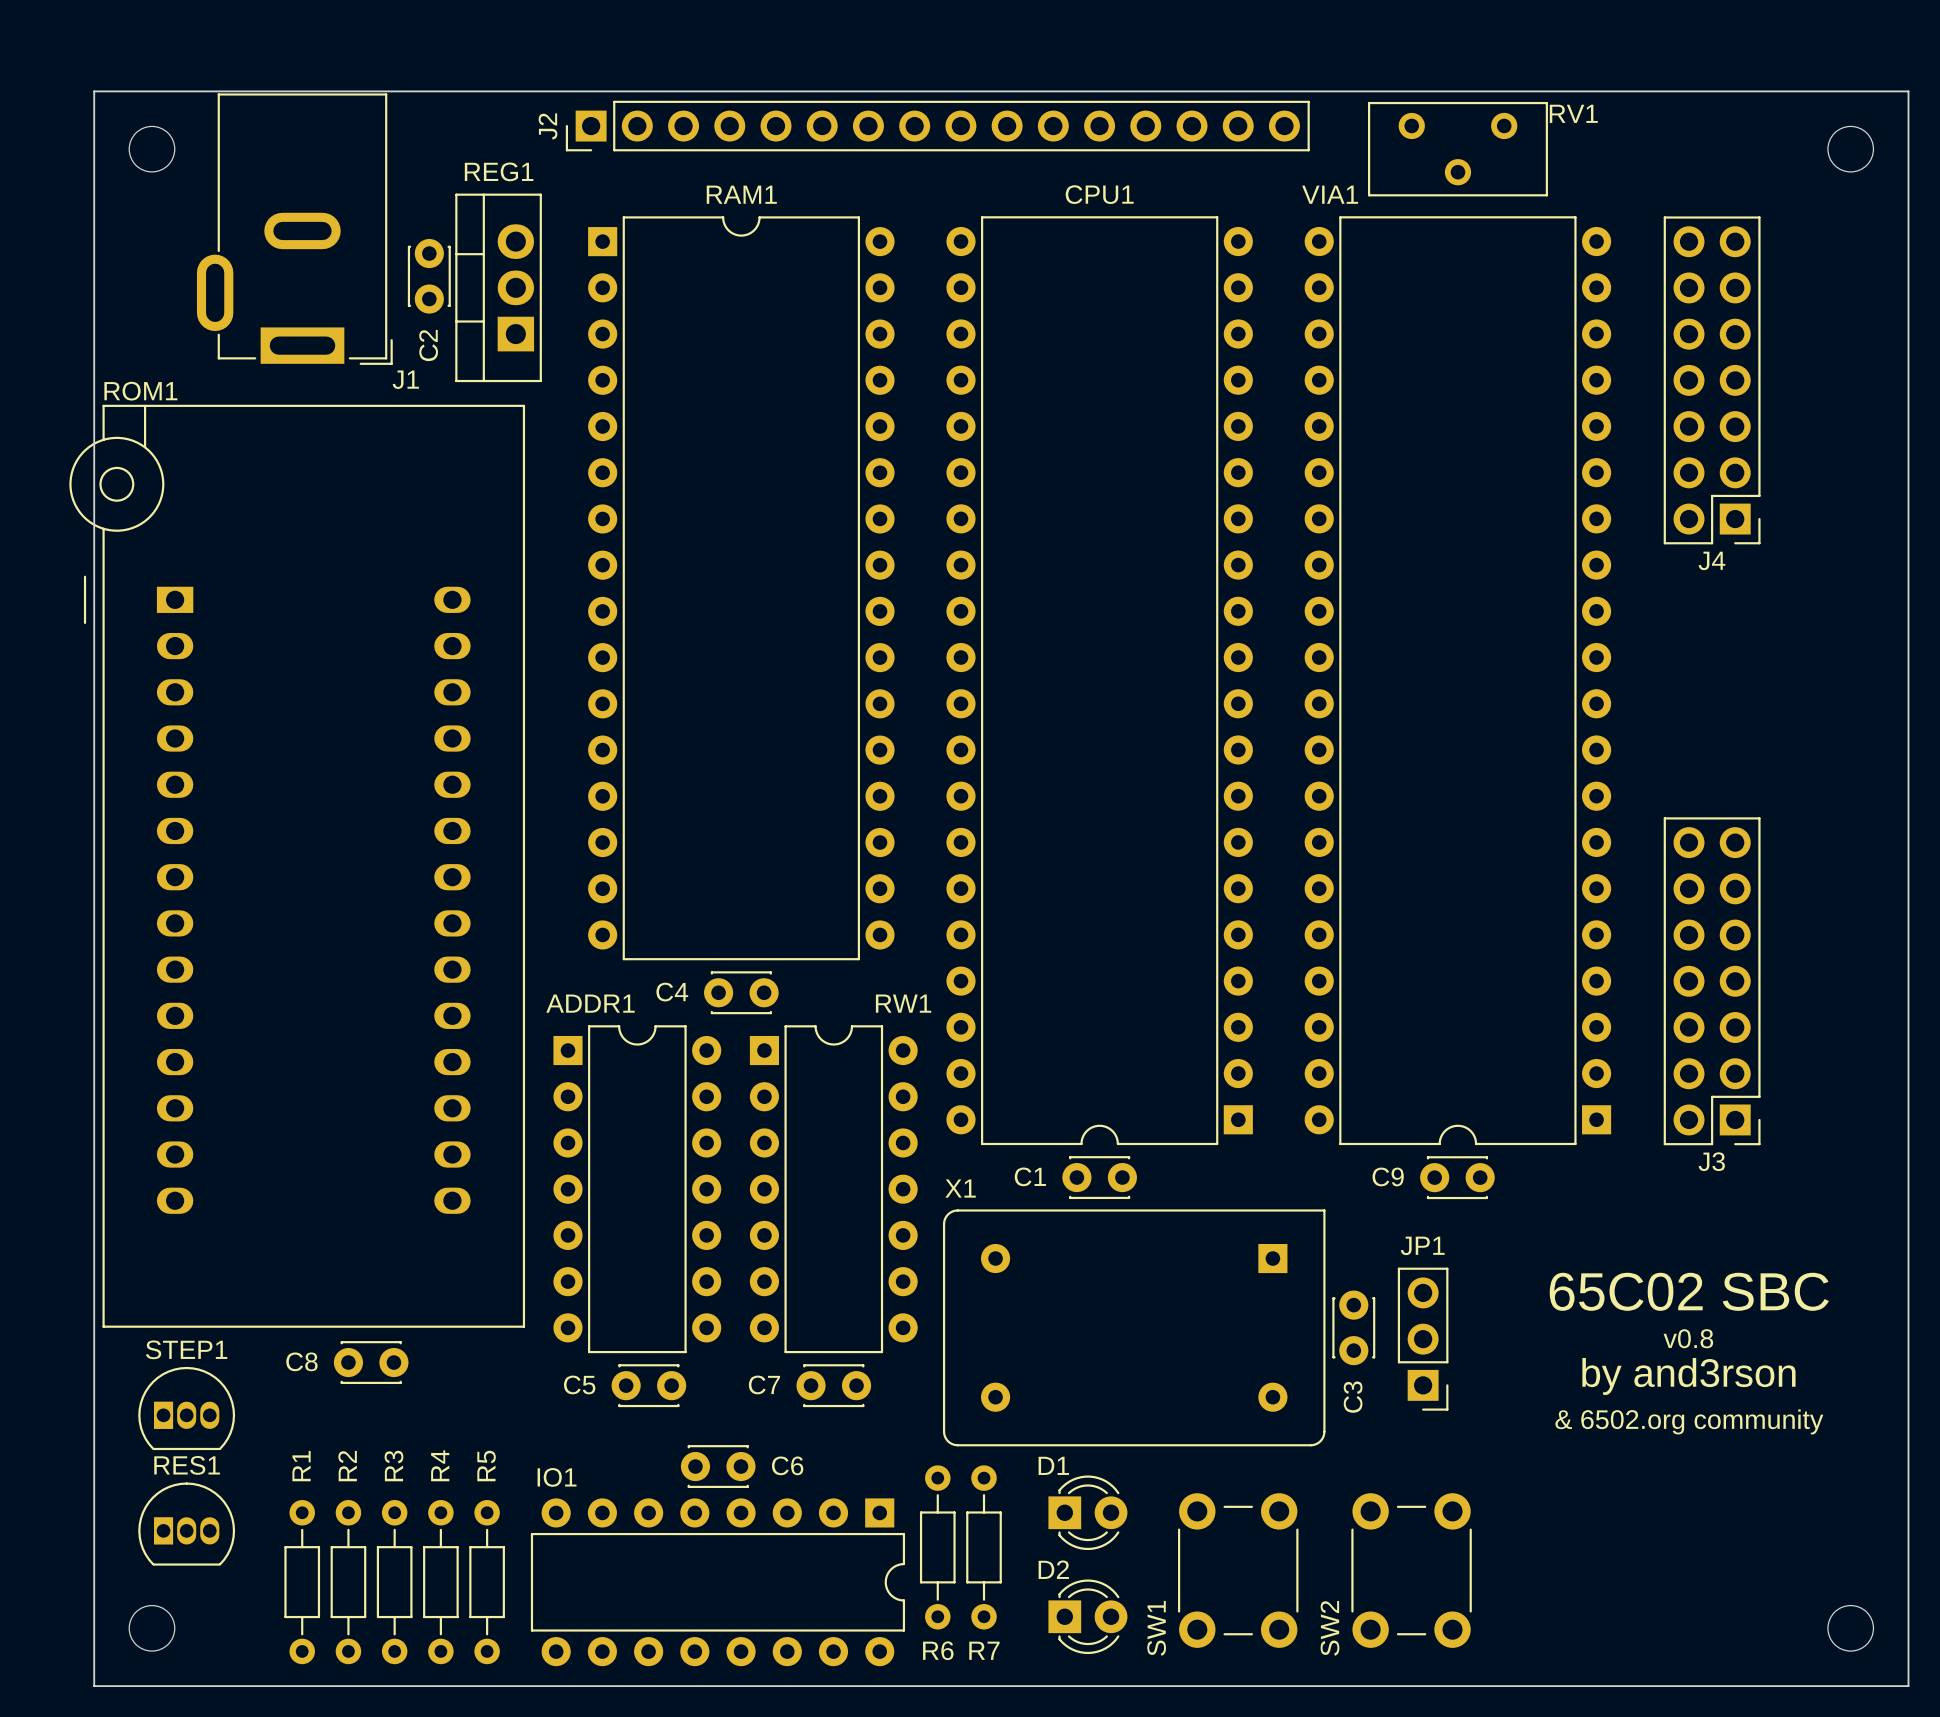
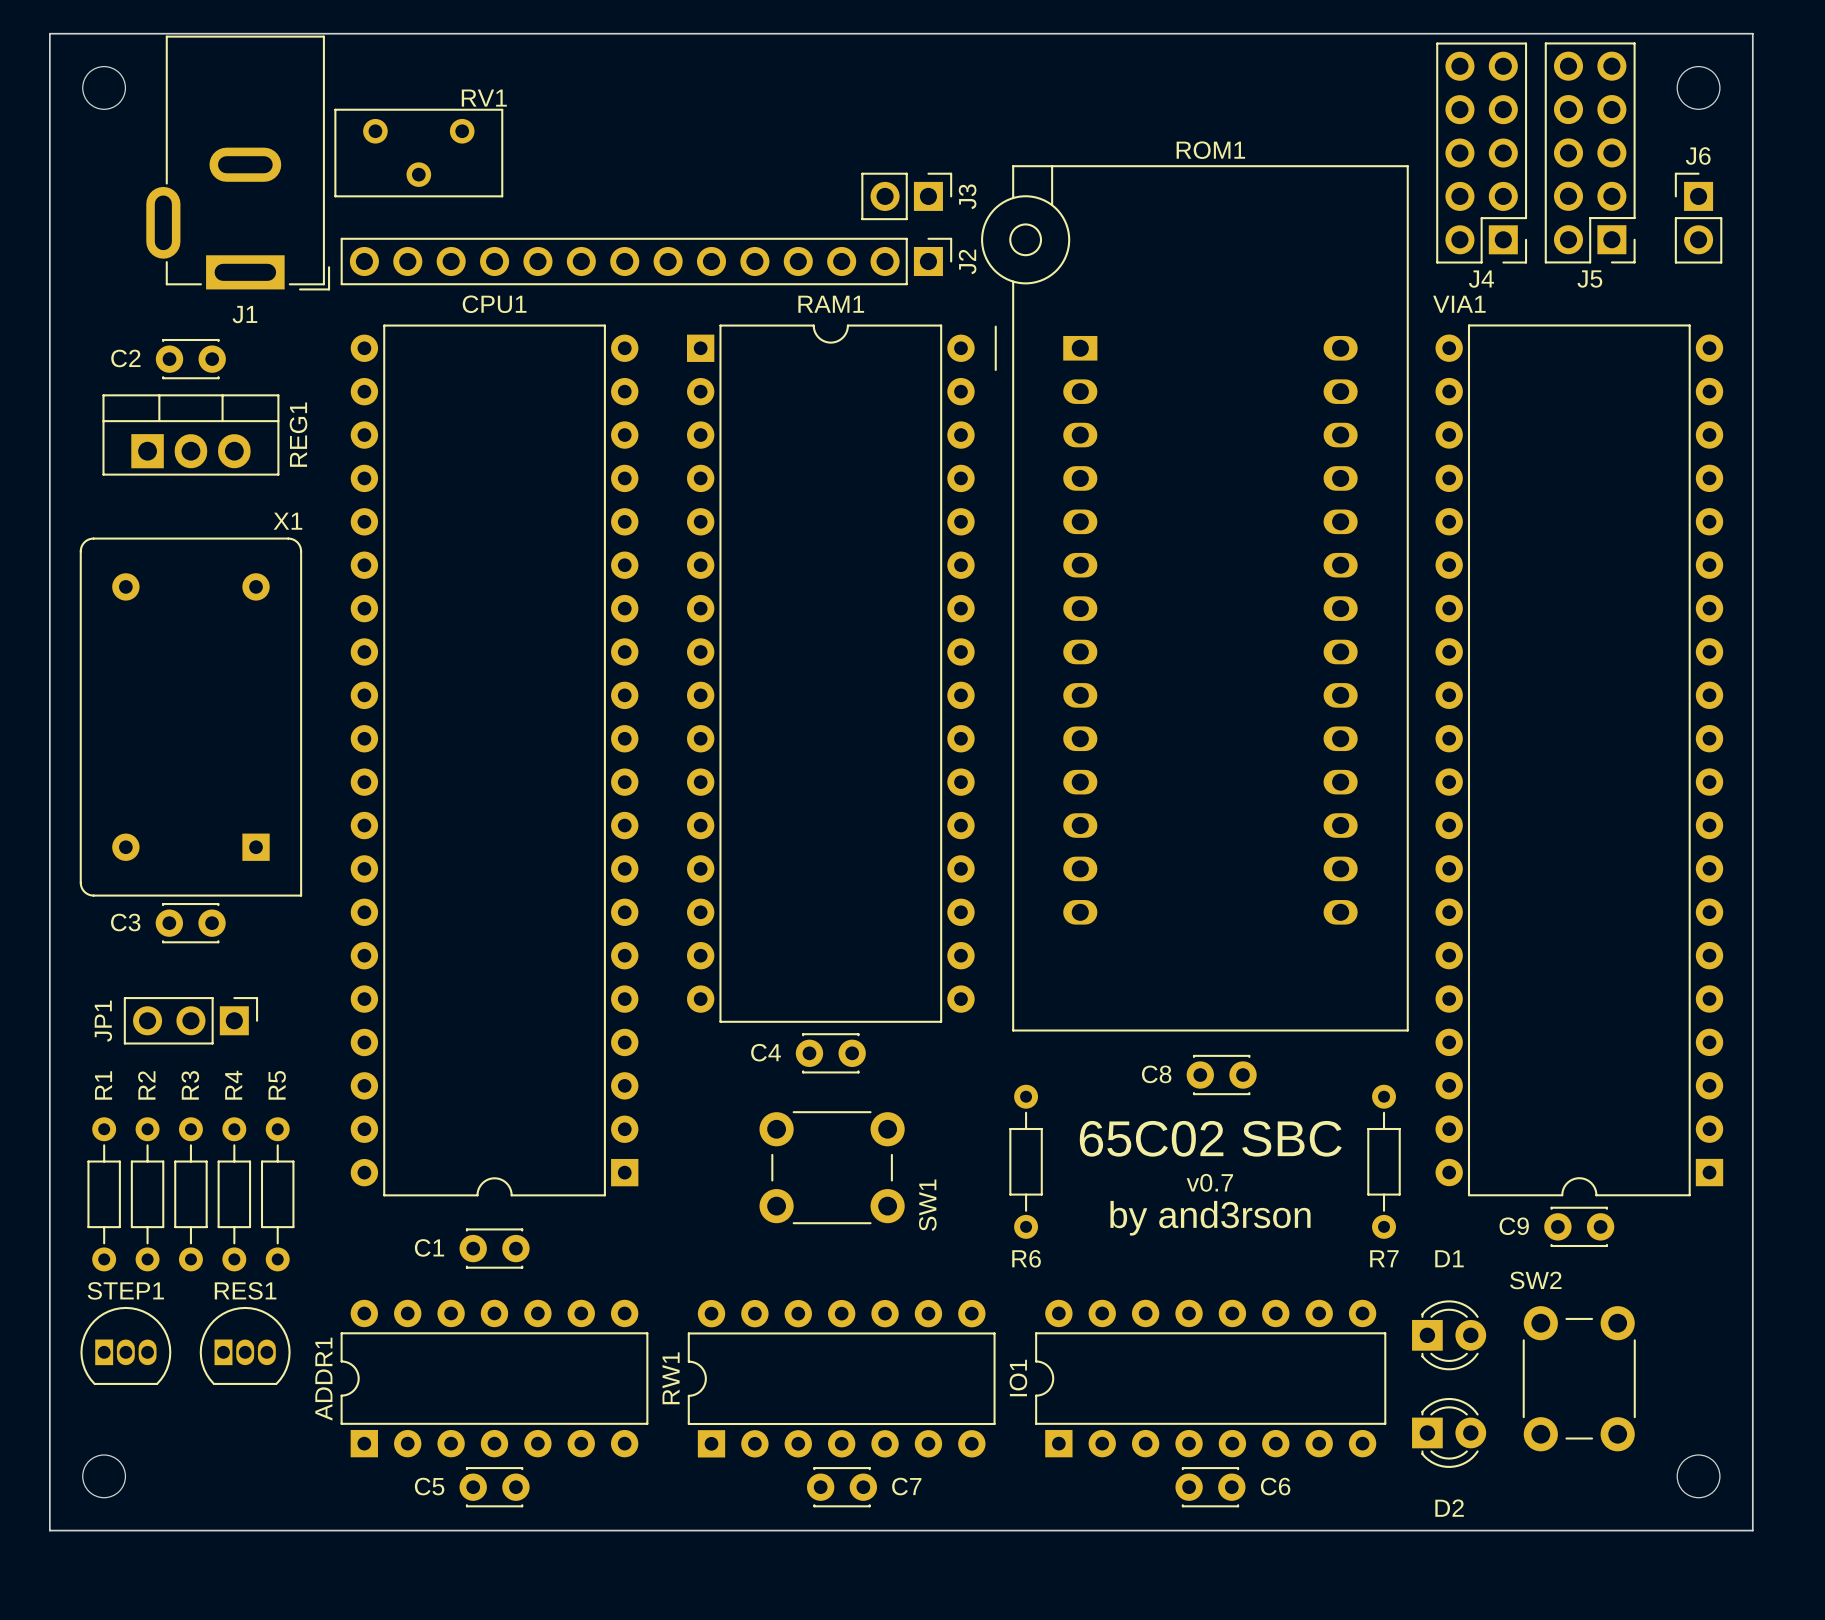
J2 footprint: [565, 100, 1310, 152] -> [340, 237, 953, 286]
RV1 name position: RV1 (1573, 113) -> RV1 (484, 98)
J2 name position: J2 (548, 126) -> J2 (967, 261)
RV1 position: (1457, 149) -> (418, 153)
J4 footprint: [1663, 216, 1761, 545] -> [1436, 42, 1528, 264]
J5: none -> (1590, 152)
C2 rotation: 0° (429, 276) -> 90° clockwise (190, 359)
C2 position: (429, 276) -> (190, 359)
REG1 rotation: 0° (498, 287) -> 90° clockwise (190, 434)
REG1 position: (498, 287) -> (190, 434)
J6: none -> (1698, 218)
J1 name position: J1 (405, 379) -> J1 (244, 314)
ROM1 name position: ROM1 (140, 391) -> ROM1 (1210, 150)
J4 name position: J4 (1711, 560) -> J4 (1481, 279)
RAM1 position: (741, 588) -> (830, 673)
CPU1 position: (1099, 680) -> (494, 760)
VIA1 position: (1457, 680) -> (1579, 760)
J3 footprint: [1663, 817, 1761, 1146] -> [861, 172, 953, 221]
ROM1 position: (297, 866) -> (1194, 598)
C4 position: (741, 992) -> (830, 1053)
ADDR1 name position: ADDR1 (590, 1003) -> ADDR1 (323, 1379)
RW1 name position: RW1 (903, 1003) -> RW1 (671, 1378)
J3 name position: J3 (1711, 1161) -> J3 (967, 196)
C1 position: (1099, 1177) -> (494, 1248)
C9 position: (1457, 1177) -> (1579, 1226)
X1 name position: X1 (960, 1188) -> X1 (287, 521)
ADDR1 rotation: 0° (637, 1189) -> 90° counterclockwise (494, 1378)
ADDR1 position: (637, 1189) -> (494, 1378)
RW1 rotation: 0° (833, 1189) -> 90° counterclockwise (841, 1378)
RW1 position: (833, 1189) -> (841, 1378)
text position: 65C02 SBC (1689, 1291) -> 65C02 SBC (1210, 1138)
text: none -> v0.7 (1209, 1182)
X1 rotation: 0° (1134, 1327) -> 90° clockwise (190, 717)
X1 position: (1134, 1327) -> (190, 717)
C3 rotation: 0° (1353, 1327) -> 90° clockwise (190, 923)
C3 position: (1353, 1327) -> (190, 923)
text: v0.8 (1688, 1338) -> none
JP1 rotation: 0° (1423, 1339) -> 90° counterclockwise (190, 1020)
JP1 position: (1423, 1339) -> (190, 1020)
C8 position: (371, 1362) -> (1221, 1075)
text position: by and3rson (1688, 1376) -> by and3rson (1210, 1218)
C7 name position: C7 (764, 1384) -> C7 (906, 1486)
C5 position: (648, 1385) -> (494, 1487)
C7 position: (833, 1385) -> (842, 1487)
STEP1 position: (186, 1408) -> (125, 1345)
text: & 6502.org community (1689, 1421) -> none
D1 name position: D1 (1053, 1465) -> D1 (1449, 1258)
C6 position: (718, 1466) -> (1210, 1487)
D1 footprint: [1048, 1475, 1128, 1551] -> [1412, 1300, 1487, 1371]
IO1 name position: IO1 (557, 1477) -> IO1 (1018, 1378)
RES1 position: (186, 1524) -> (245, 1345)
R6 position: (937, 1547) -> (1026, 1161)
R7 position: (984, 1547) -> (1384, 1161)
D2 name position: D2 (1053, 1569) -> D2 (1449, 1508)
SW1 rotation: 0° (1238, 1570) -> 90° clockwise (832, 1167)
SW1 position: (1238, 1570) -> (832, 1167)
SW2 position: (1411, 1570) -> (1579, 1378)
D2 footprint: [1048, 1579, 1128, 1655] -> [1412, 1397, 1487, 1468]
R1 position: (302, 1582) -> (104, 1194)
R2 position: (348, 1582) -> (147, 1194)
R3 position: (394, 1582) -> (190, 1194)
R4 position: (440, 1582) -> (234, 1194)
R5 position: (487, 1582) -> (277, 1194)
IO1 rotation: 0° (717, 1582) -> 180° (1210, 1378)
IO1 position: (717, 1582) -> (1210, 1378)
SW1 name position: SW1 (1156, 1628) -> SW1 (927, 1205)
SW2 name rotation: 0° (1330, 1628) -> 90° clockwise (1535, 1280)
SW2 name position: SW2 (1330, 1628) -> SW2 (1535, 1280)

